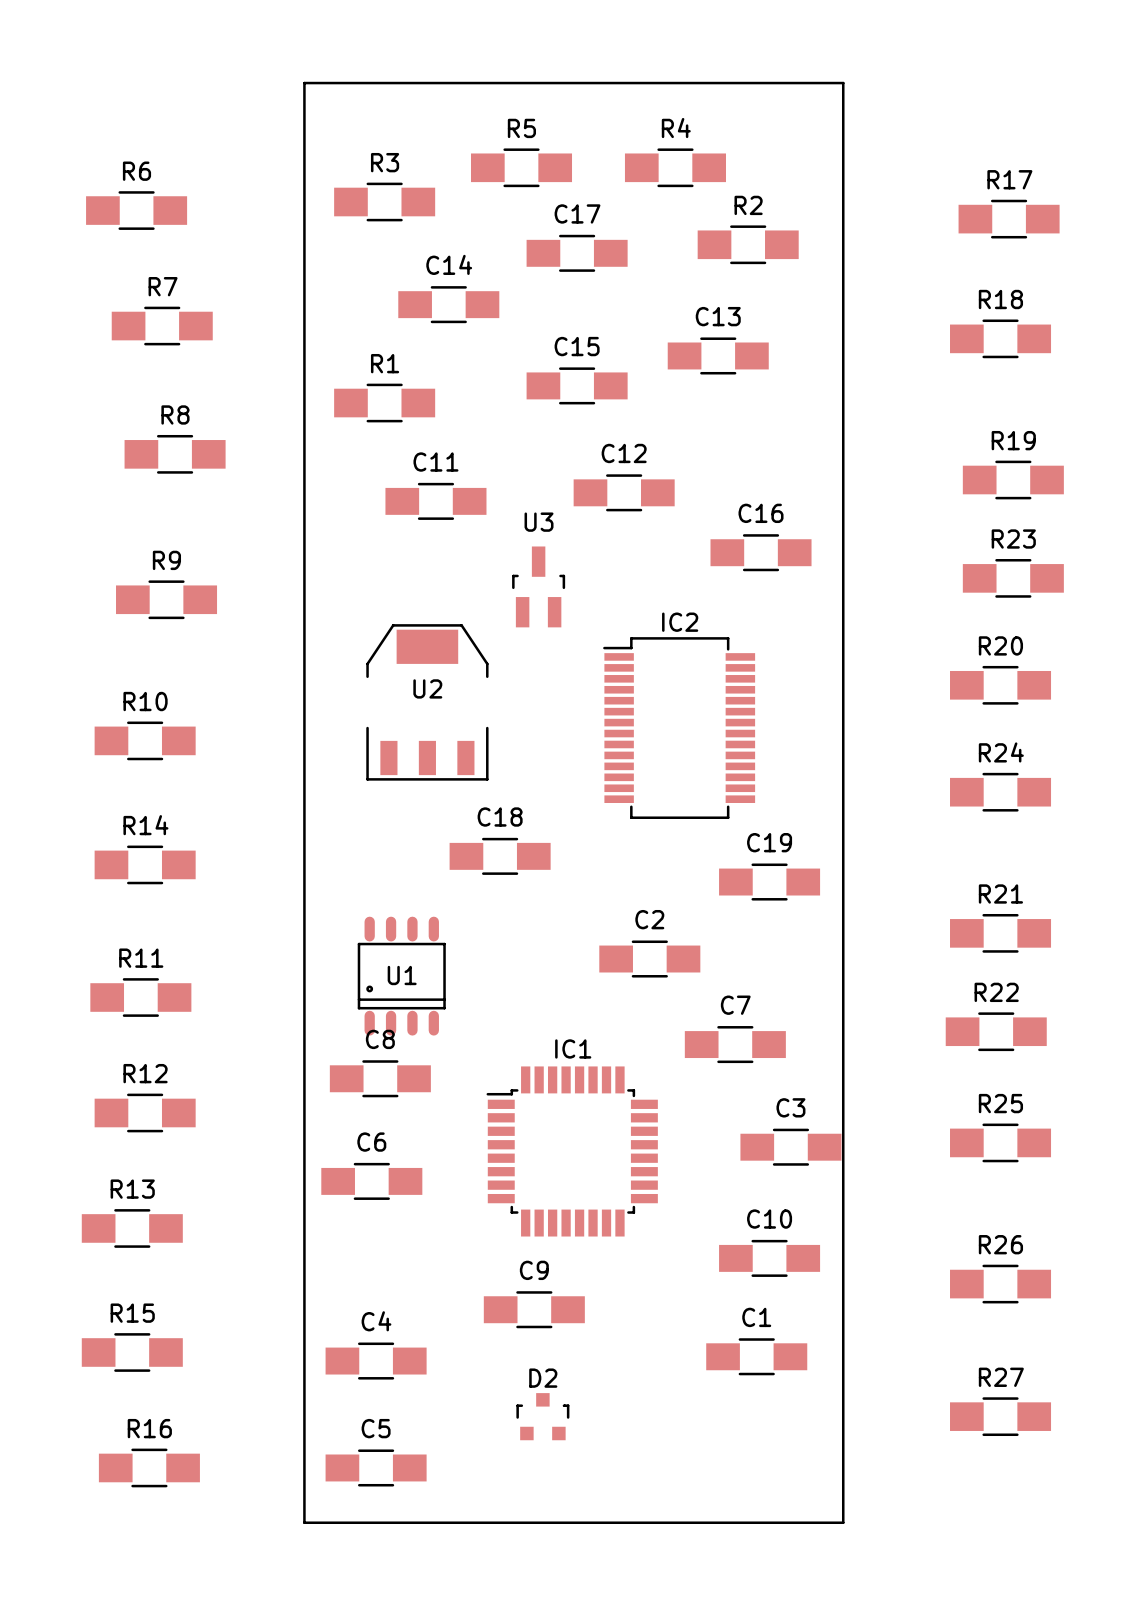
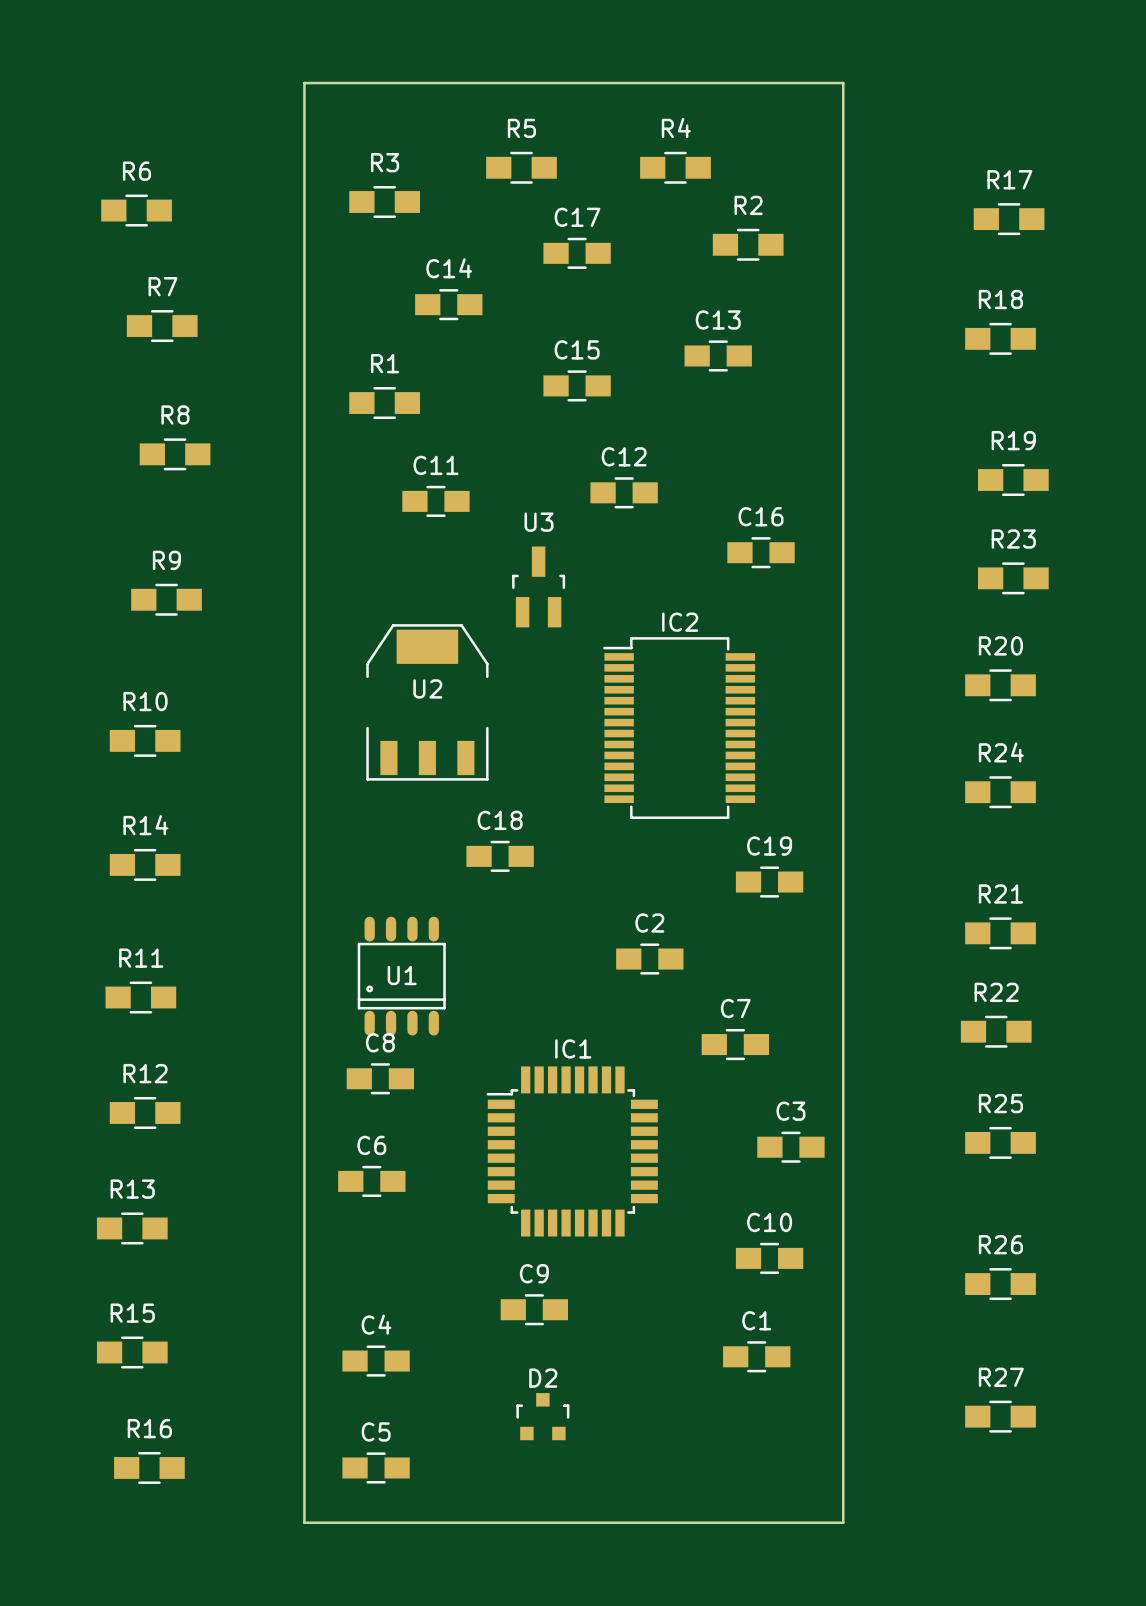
R5 footprint: [470, 148, 573, 188] -> [486, 151, 557, 184]
R4 footprint: [624, 148, 726, 188] -> [640, 151, 711, 184]
R3 footprint: [334, 182, 436, 222] -> [349, 186, 421, 218]
R6 footprint: [86, 191, 188, 230] -> [101, 194, 172, 227]
R17 footprint: [958, 199, 1060, 239] -> [973, 203, 1045, 236]
R2 footprint: [697, 225, 799, 265] -> [712, 228, 784, 261]
C17 footprint: [526, 234, 628, 272] -> [543, 237, 611, 269]
C14 footprint: [398, 286, 500, 324] -> [415, 289, 483, 321]
R7 footprint: [111, 306, 213, 346] -> [126, 310, 198, 343]
R18 footprint: [950, 319, 1052, 359] -> [965, 322, 1036, 355]
C13 footprint: [667, 337, 769, 375] -> [684, 340, 752, 372]
C15 footprint: [526, 367, 628, 405] -> [543, 370, 611, 402]
R1 footprint: [334, 383, 436, 423] -> [349, 387, 421, 420]
R8 footprint: [124, 434, 226, 474] -> [139, 438, 211, 471]
R19 footprint: [962, 460, 1064, 500] -> [977, 464, 1049, 496]
C12 footprint: [573, 474, 675, 512] -> [590, 477, 658, 509]
C11 footprint: [385, 482, 487, 520] -> [402, 485, 470, 517]
C16 footprint: [710, 534, 812, 572] -> [727, 537, 795, 569]
R23 footprint: [962, 559, 1064, 598] -> [977, 562, 1049, 595]
R9 footprint: [116, 580, 218, 620] -> [131, 583, 202, 616]
R20 footprint: [950, 665, 1052, 705] -> [965, 669, 1036, 702]
R10 footprint: [94, 721, 196, 761] -> [109, 724, 181, 757]
R24 footprint: [950, 772, 1052, 812] -> [965, 776, 1036, 809]
C18 footprint: [449, 837, 551, 875] -> [466, 840, 534, 872]
R14 footprint: [94, 845, 196, 885] -> [109, 848, 181, 881]
C19 footprint: [719, 863, 821, 901] -> [735, 866, 804, 898]
R21 footprint: [950, 913, 1052, 953] -> [965, 917, 1036, 950]
C2 footprint: [599, 940, 701, 978] -> [616, 943, 684, 975]
R11 footprint: [90, 978, 192, 1017] -> [105, 981, 177, 1014]
R22 footprint: [945, 1012, 1047, 1052] -> [960, 1015, 1032, 1048]
C7 footprint: [684, 1026, 786, 1064] -> [701, 1028, 770, 1061]
C8 footprint: [329, 1060, 431, 1098] -> [346, 1063, 415, 1095]
R12 footprint: [94, 1093, 196, 1133] -> [109, 1096, 181, 1129]
R25 footprint: [950, 1123, 1052, 1163] -> [965, 1126, 1036, 1159]
C3 footprint: [740, 1128, 842, 1166] -> [757, 1131, 825, 1163]
C6 footprint: [321, 1162, 423, 1200] -> [338, 1165, 406, 1197]
R13 footprint: [81, 1209, 183, 1248] -> [96, 1212, 168, 1245]
C10 footprint: [719, 1239, 821, 1277] -> [735, 1242, 804, 1274]
R26 footprint: [950, 1264, 1052, 1304] -> [965, 1268, 1036, 1301]
C9 footprint: [483, 1291, 585, 1329] -> [500, 1294, 569, 1326]
R15 footprint: [81, 1333, 183, 1372] -> [96, 1336, 168, 1369]
C1 footprint: [706, 1338, 808, 1376] -> [723, 1341, 791, 1373]
C4 footprint: [325, 1342, 427, 1380] -> [342, 1345, 410, 1377]
R27 footprint: [950, 1397, 1052, 1437] -> [965, 1400, 1036, 1433]
R16 footprint: [98, 1448, 200, 1488] -> [114, 1451, 185, 1484]
C5 footprint: [325, 1449, 427, 1487] -> [342, 1452, 410, 1484]

